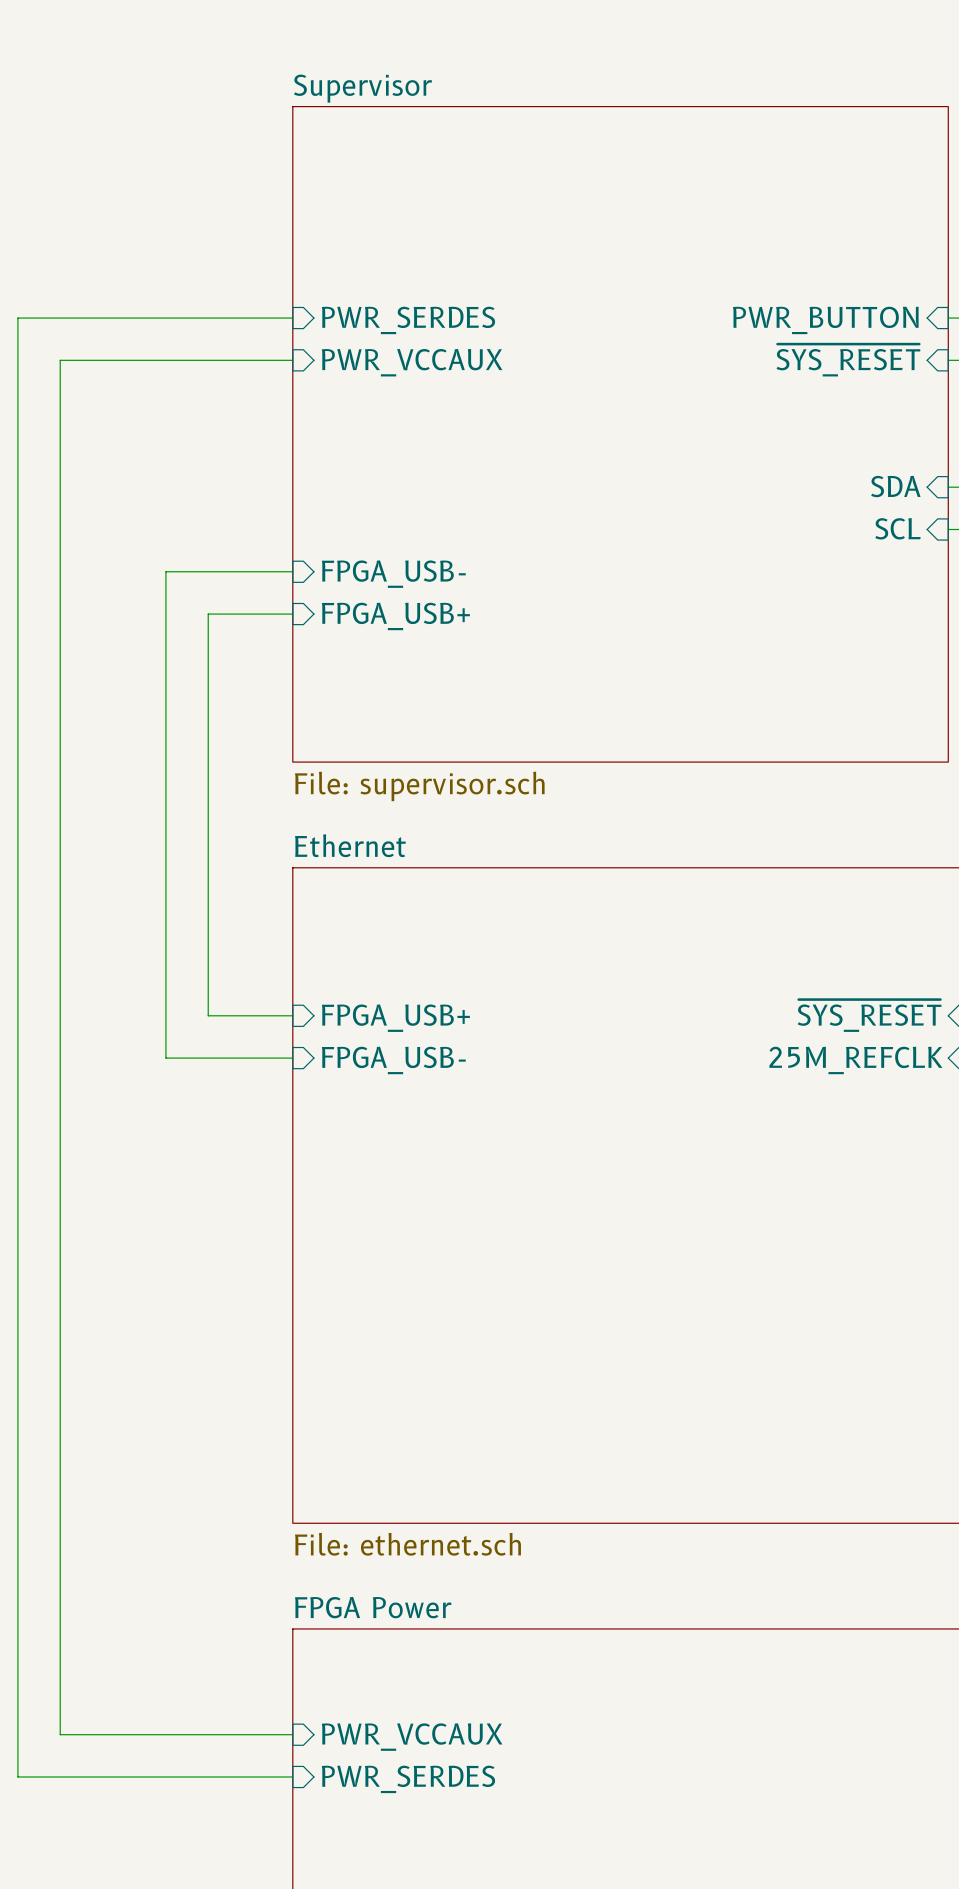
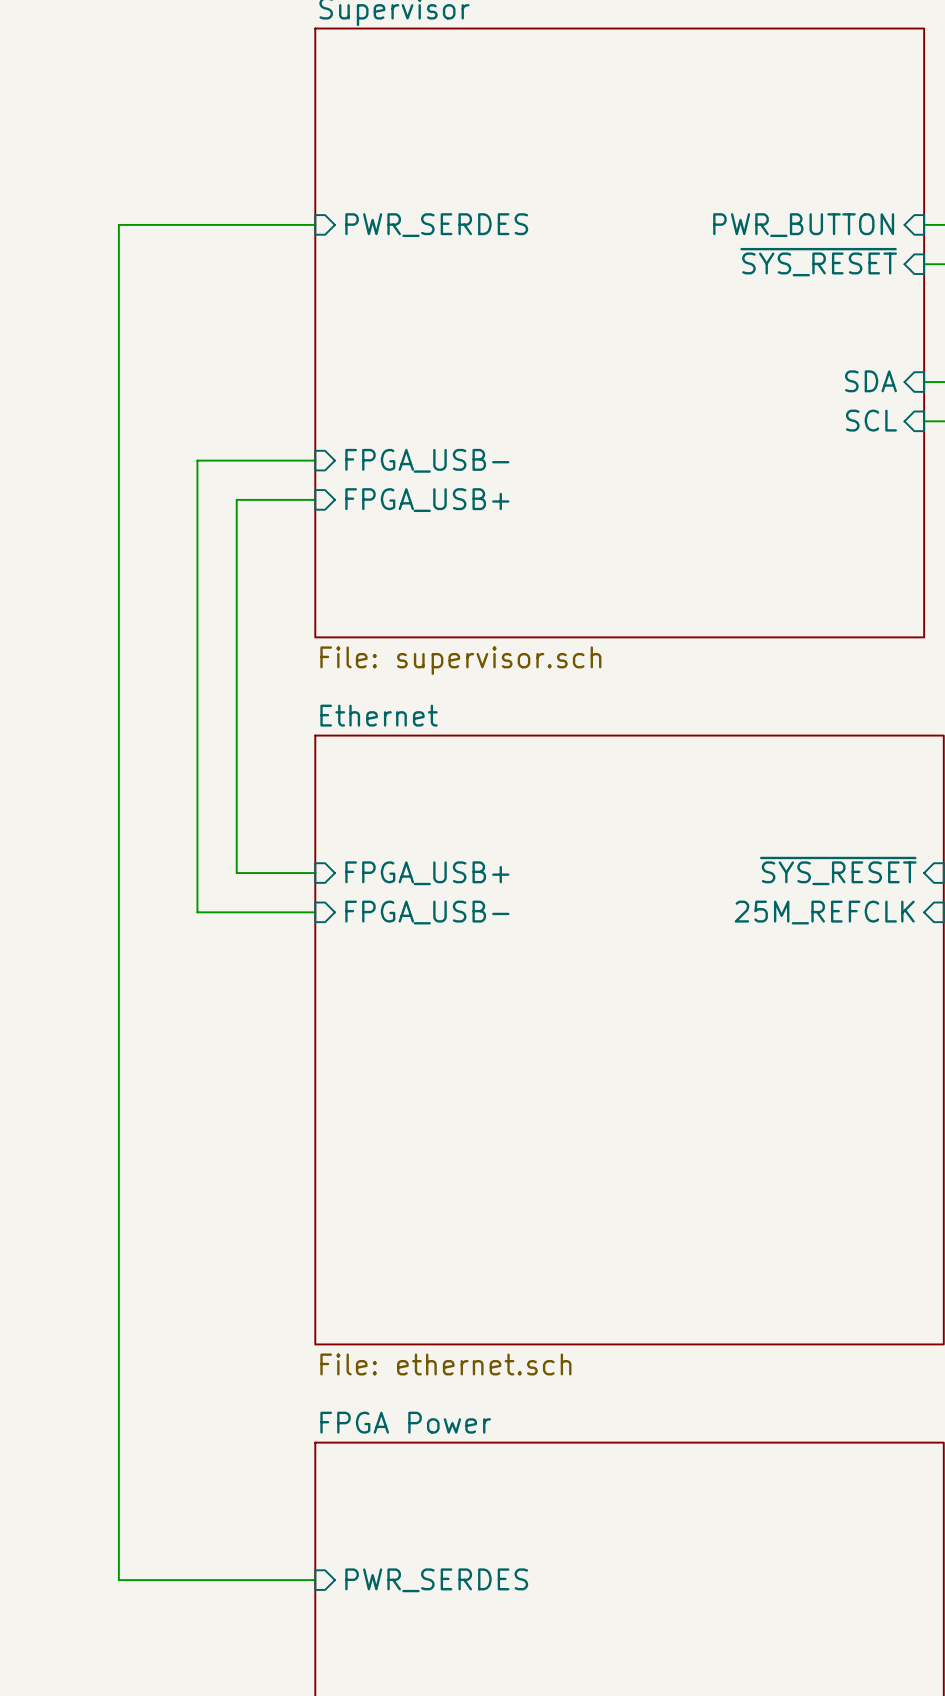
wire: (81, 318) (17, 318) (17, 1776) (81, 1776) -> (118, 224) (118, 1580)
wire: (292, 360) (60, 360) (60, 1734) (292, 1734) -> none
sheet pin: PWR_VCCAUX (412, 362) -> none
sheet pin: PWR_VCCAUX (412, 1737) -> none

